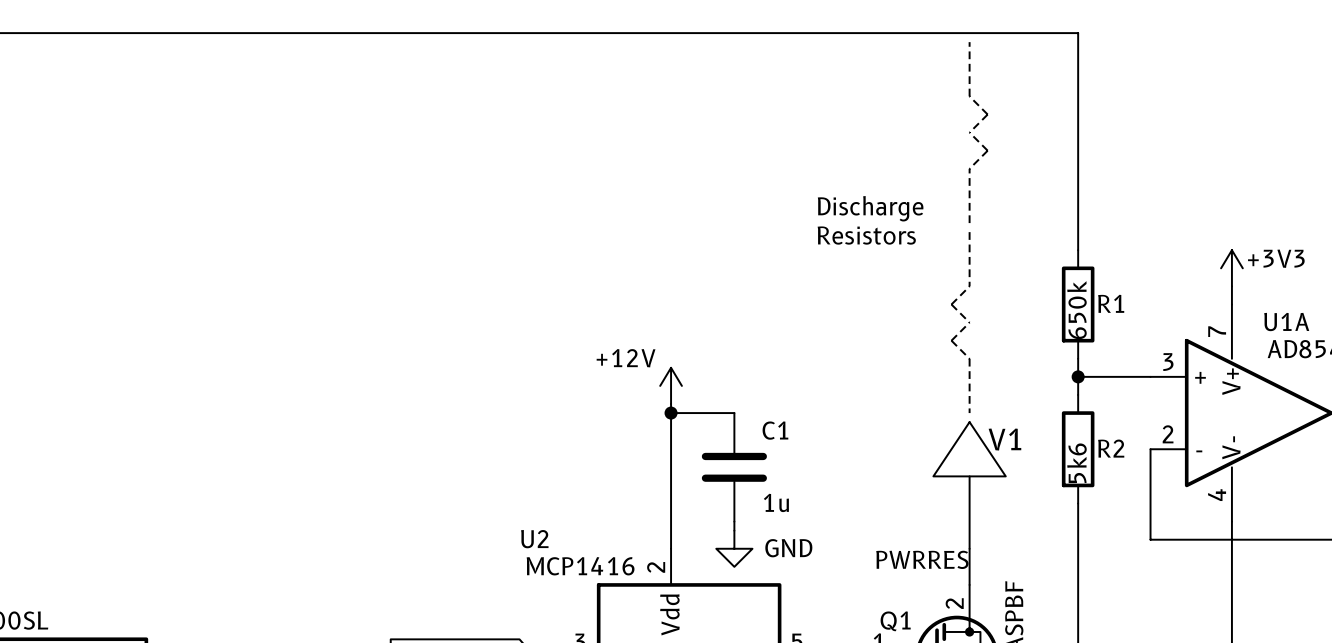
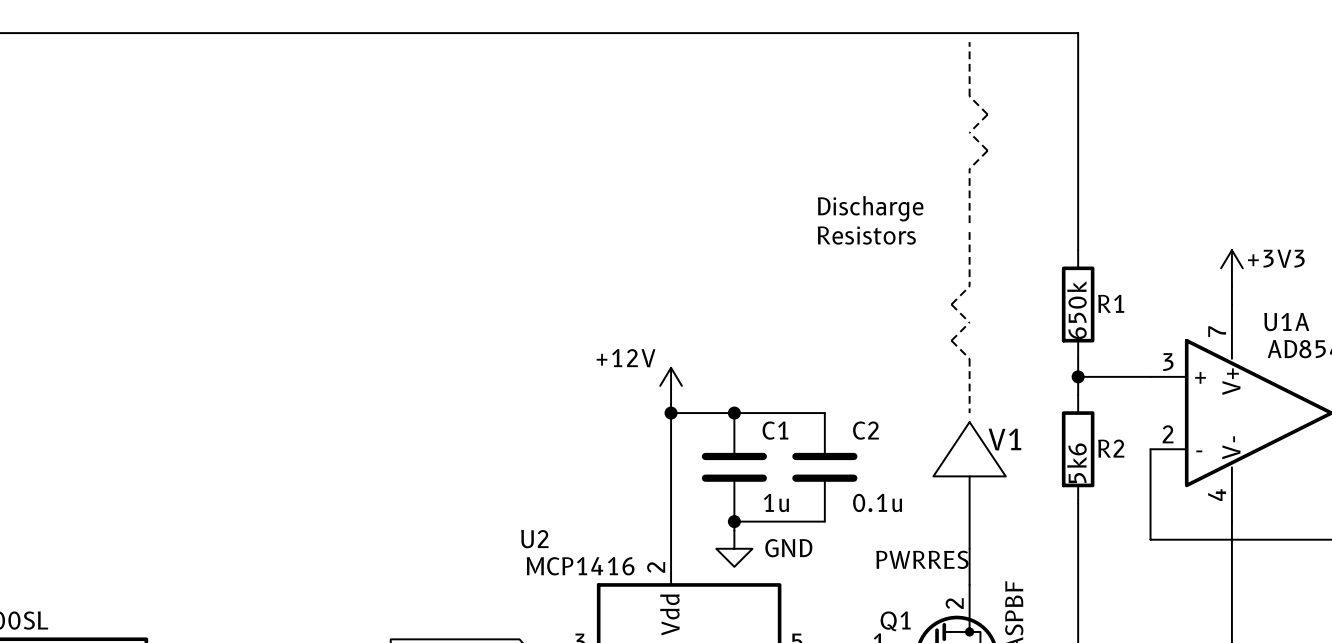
wire: none -> (734, 413) (824, 413)
junction: none -> (734, 413)
C2: none -> 0.1u (824, 467)
wire: none -> (734, 521) (824, 521)
junction: none -> (734, 521)

